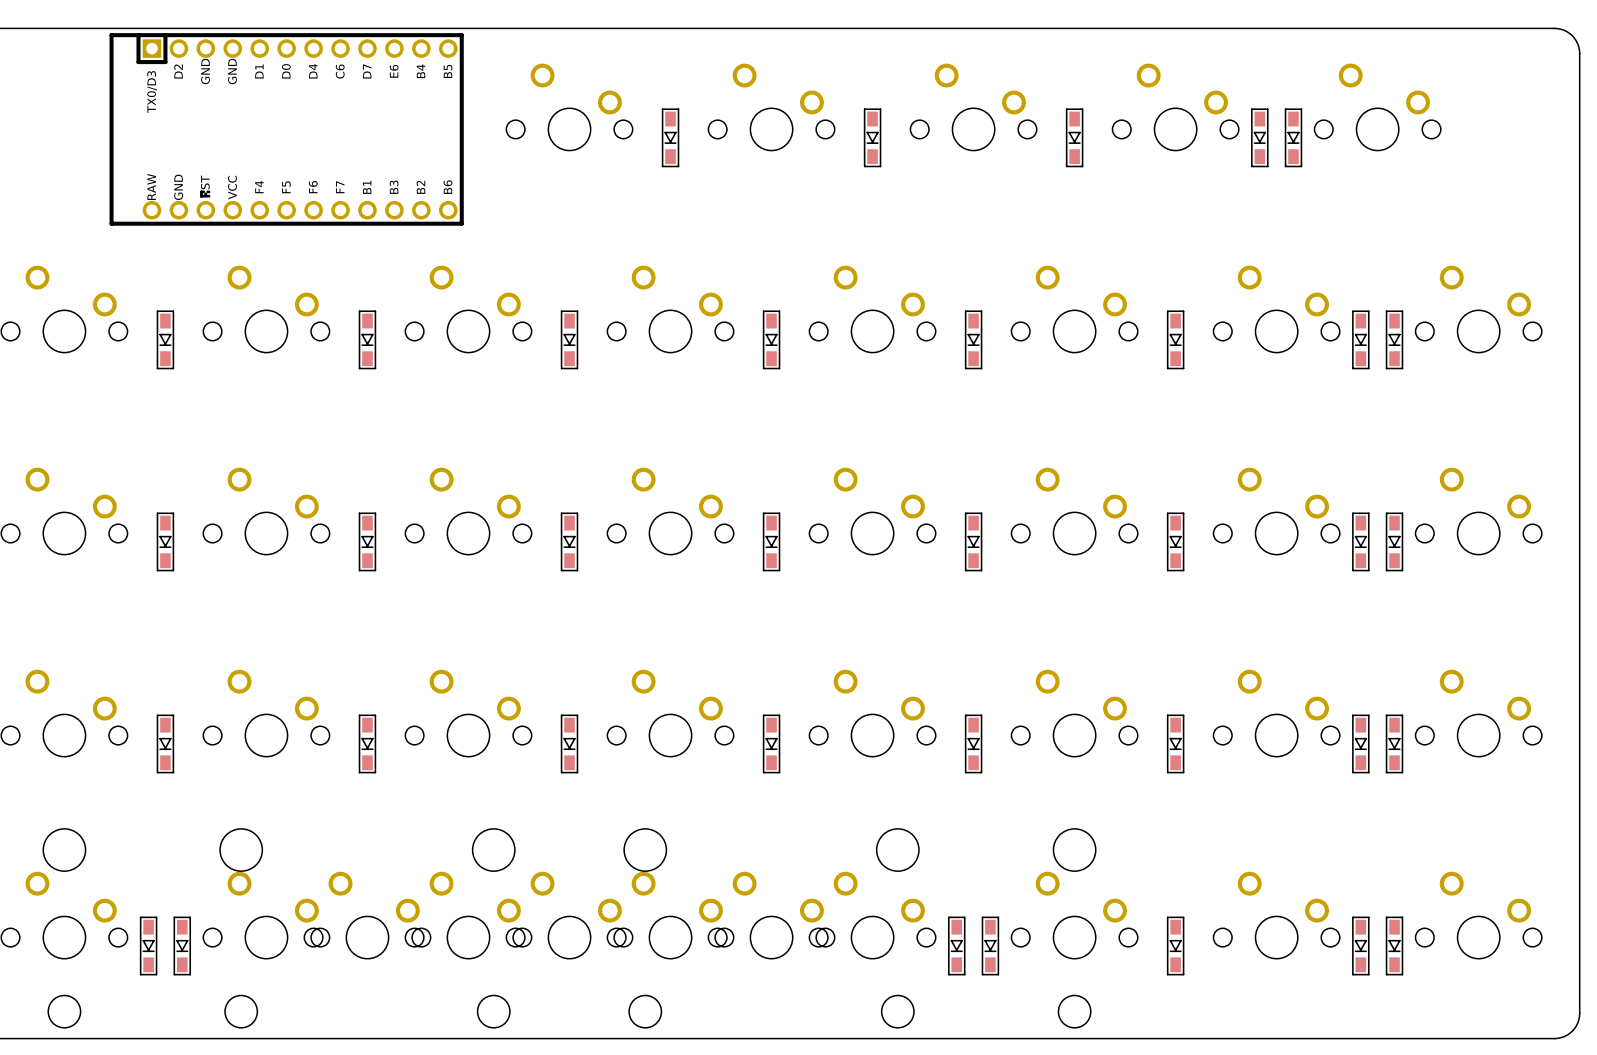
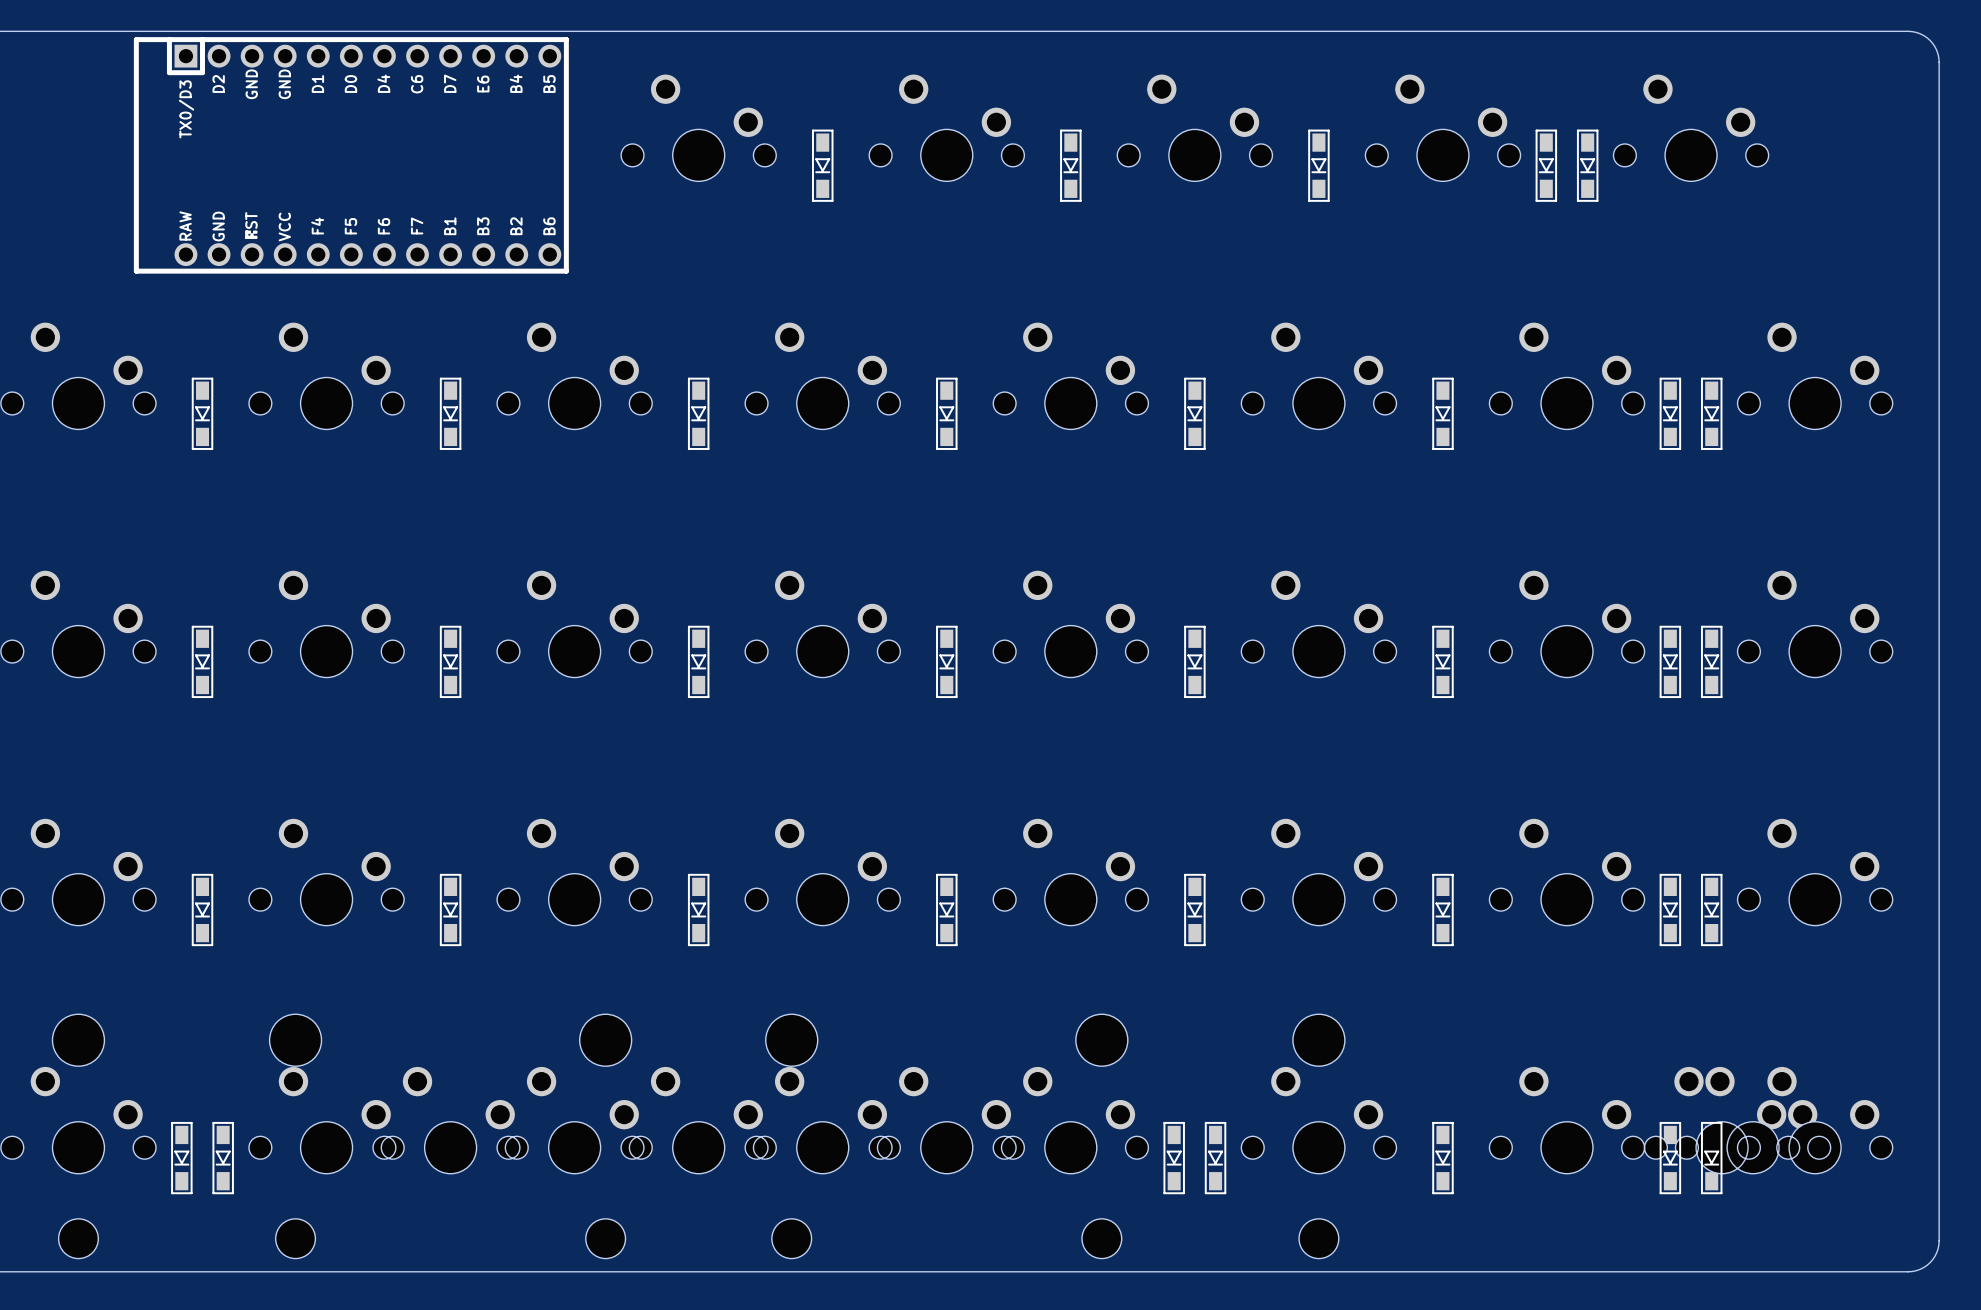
part: none -> (1722, 1120)
part: none -> (1753, 1120)

